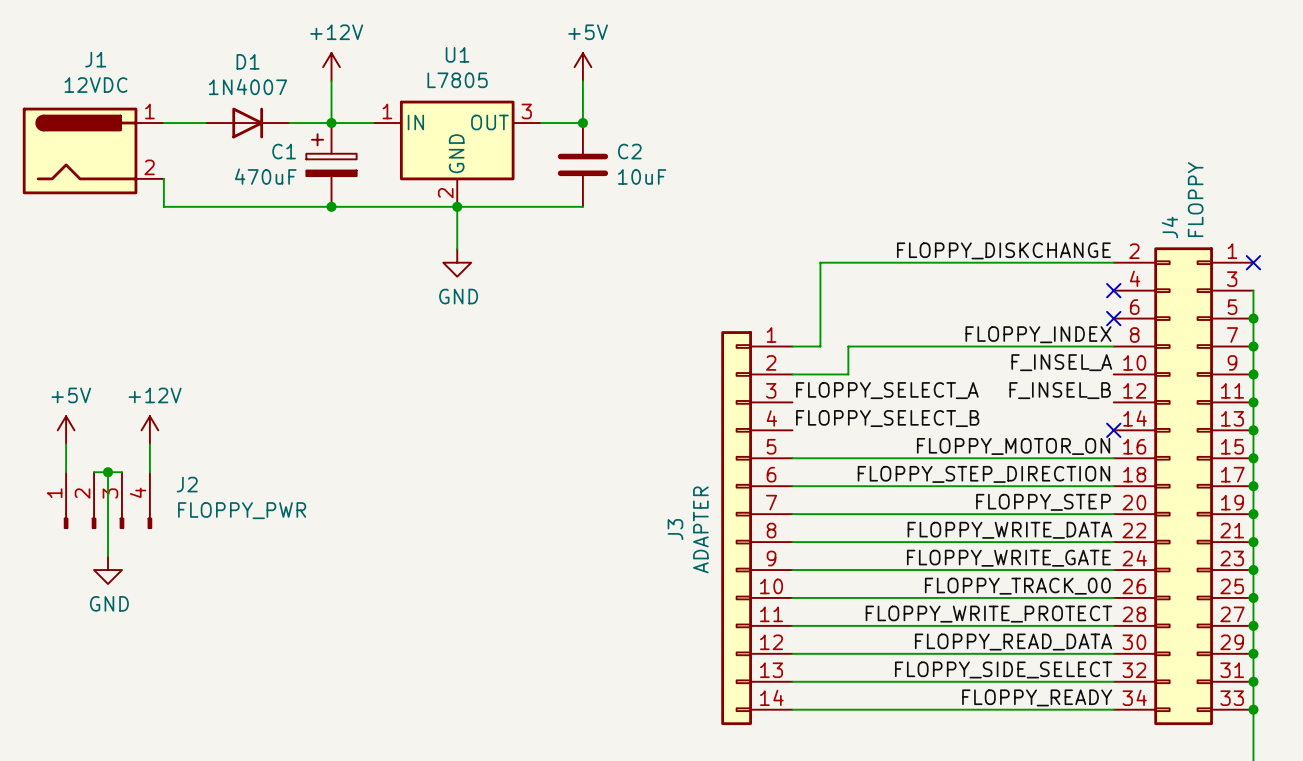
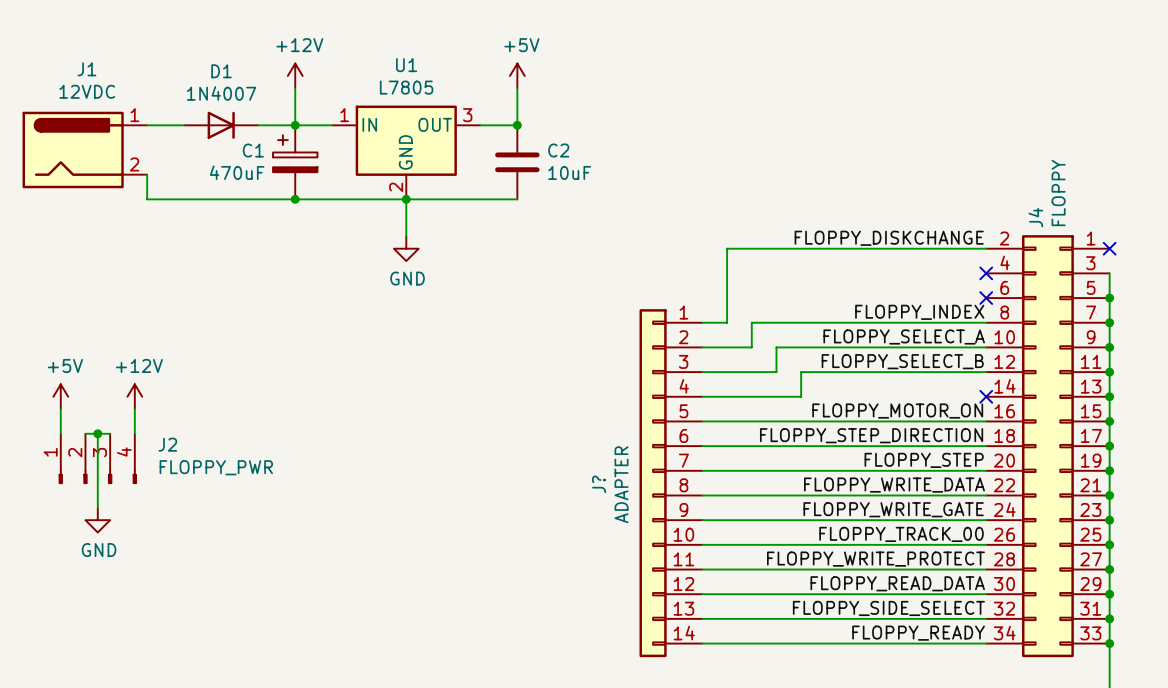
label: F_INSEL_A (1061, 362) -> FLOPPY_SELECT_A (904, 336)
wire: none -> (986, 347) (776, 347) (776, 372) (702, 372)
label: FLOPPY_SELECT_A (887, 390) -> none
label: F_INSEL_B (1060, 390) -> FLOPPY_SELECT_B (902, 361)
wire: none -> (986, 372) (801, 372) (801, 396) (702, 396)
label: FLOPPY_SELECT_B (887, 418) -> none
J3 name: J3 (675, 529) -> J? (599, 484)

